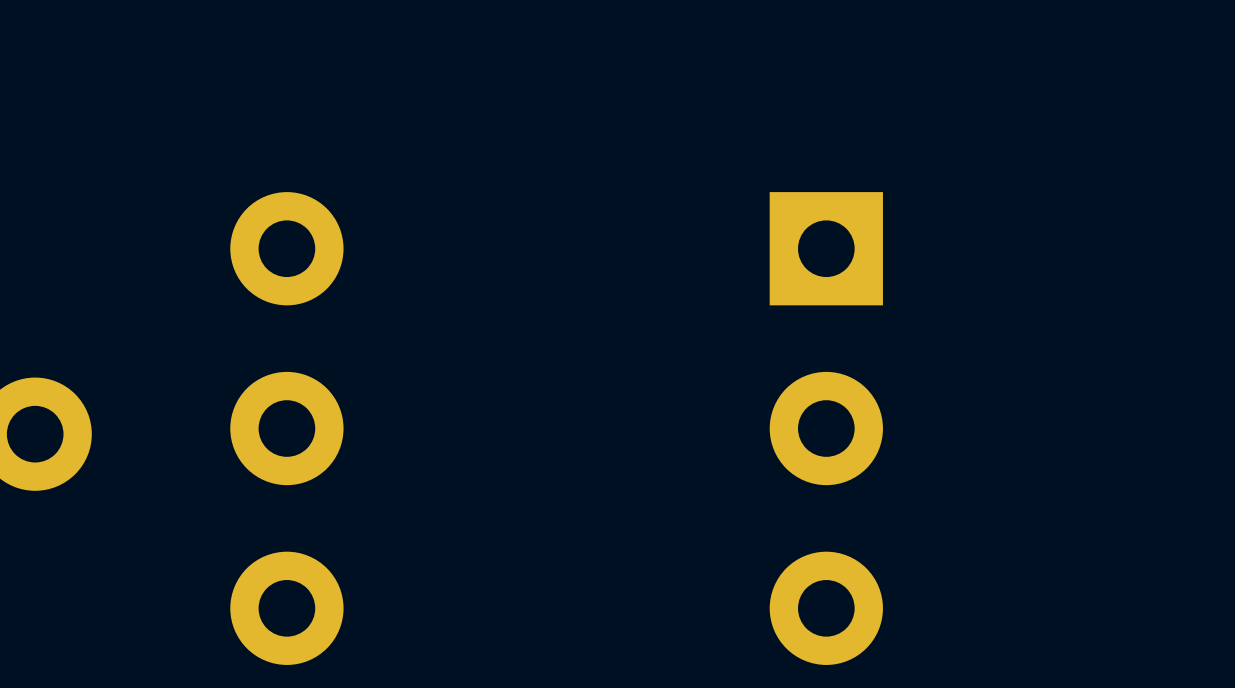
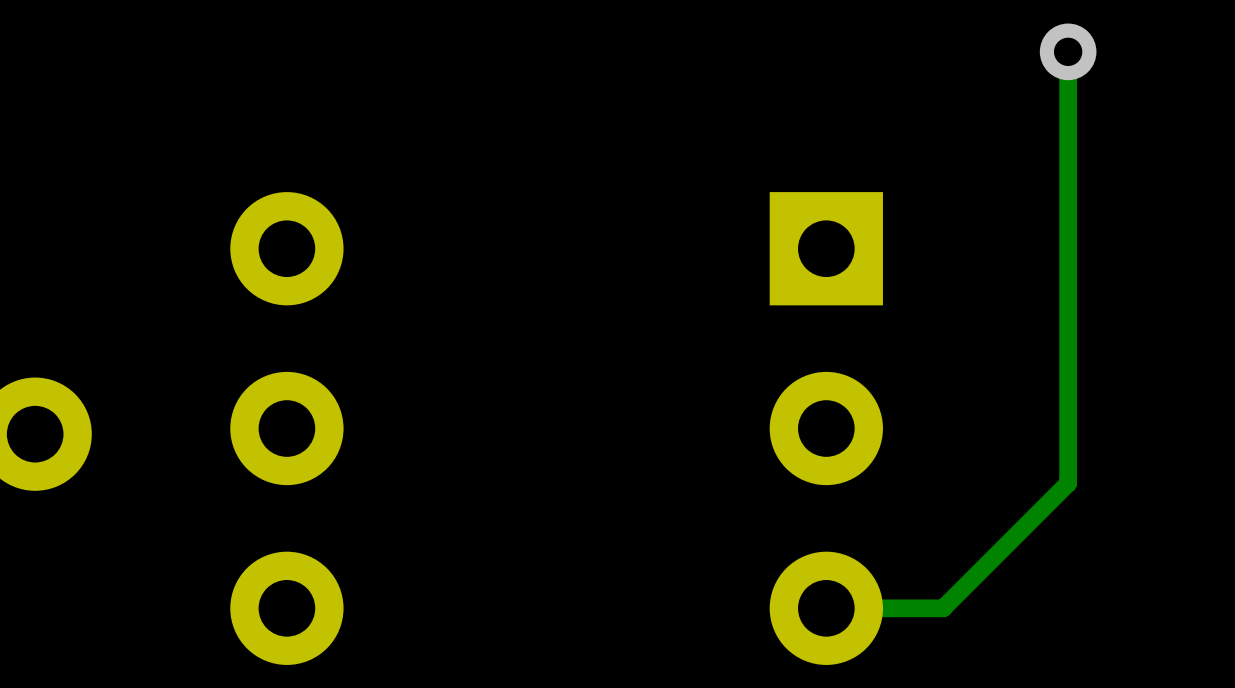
track: none -> (1068, 51) (1068, 483) (943, 608) (826, 608)
via: none -> (1068, 51)

